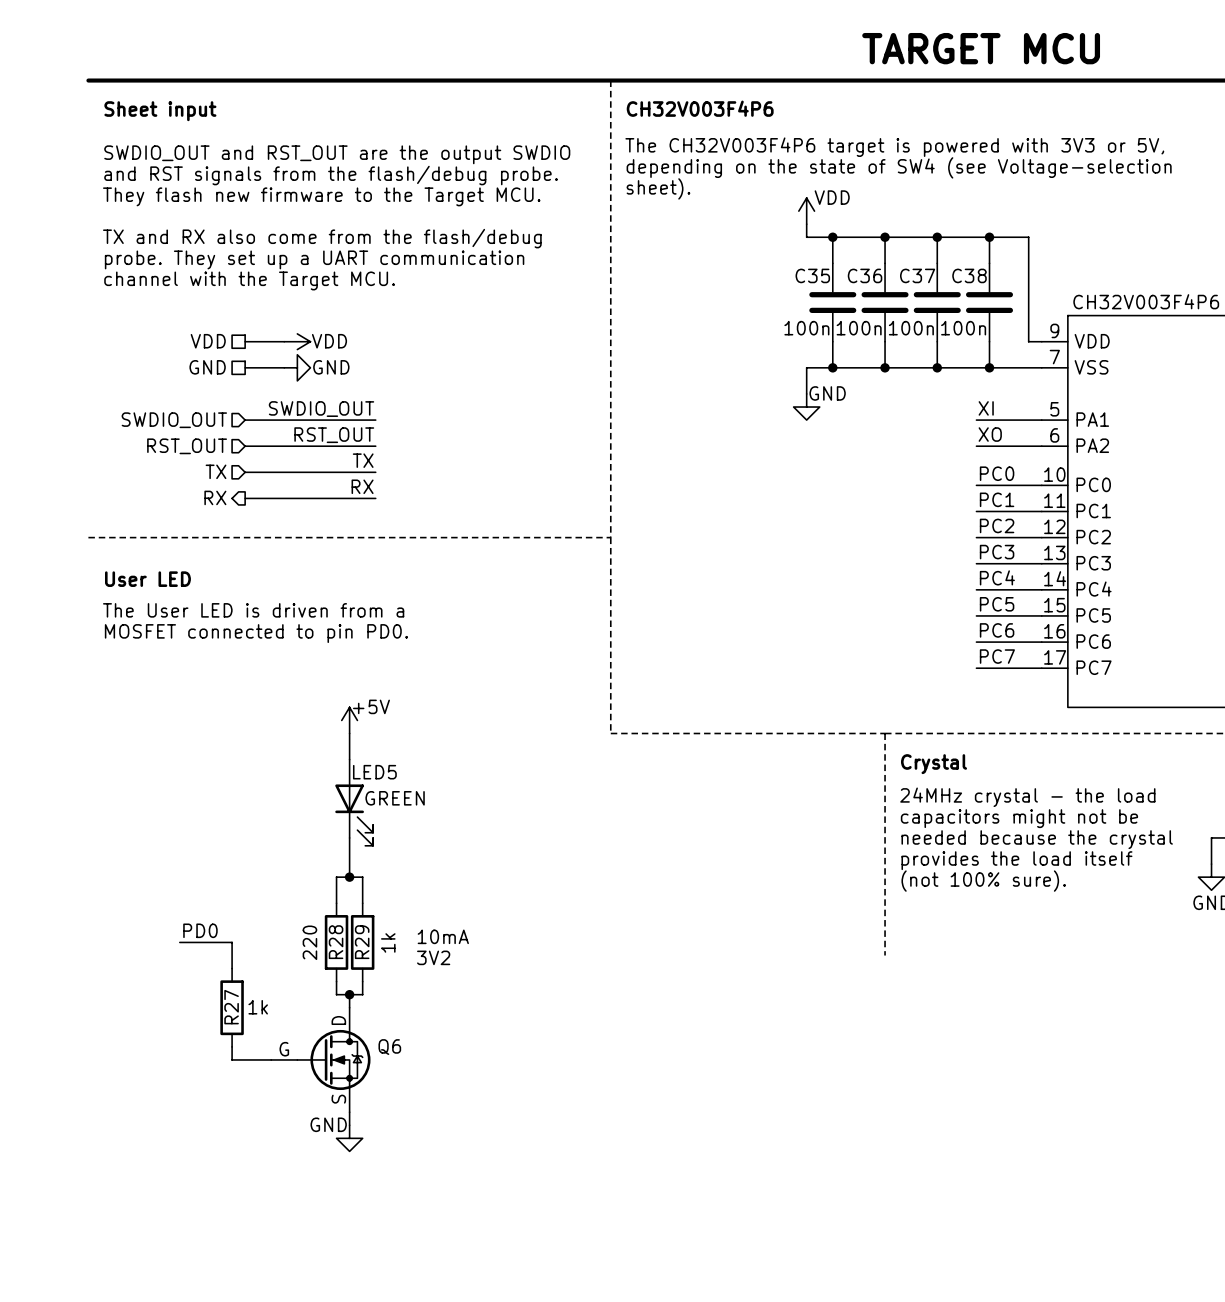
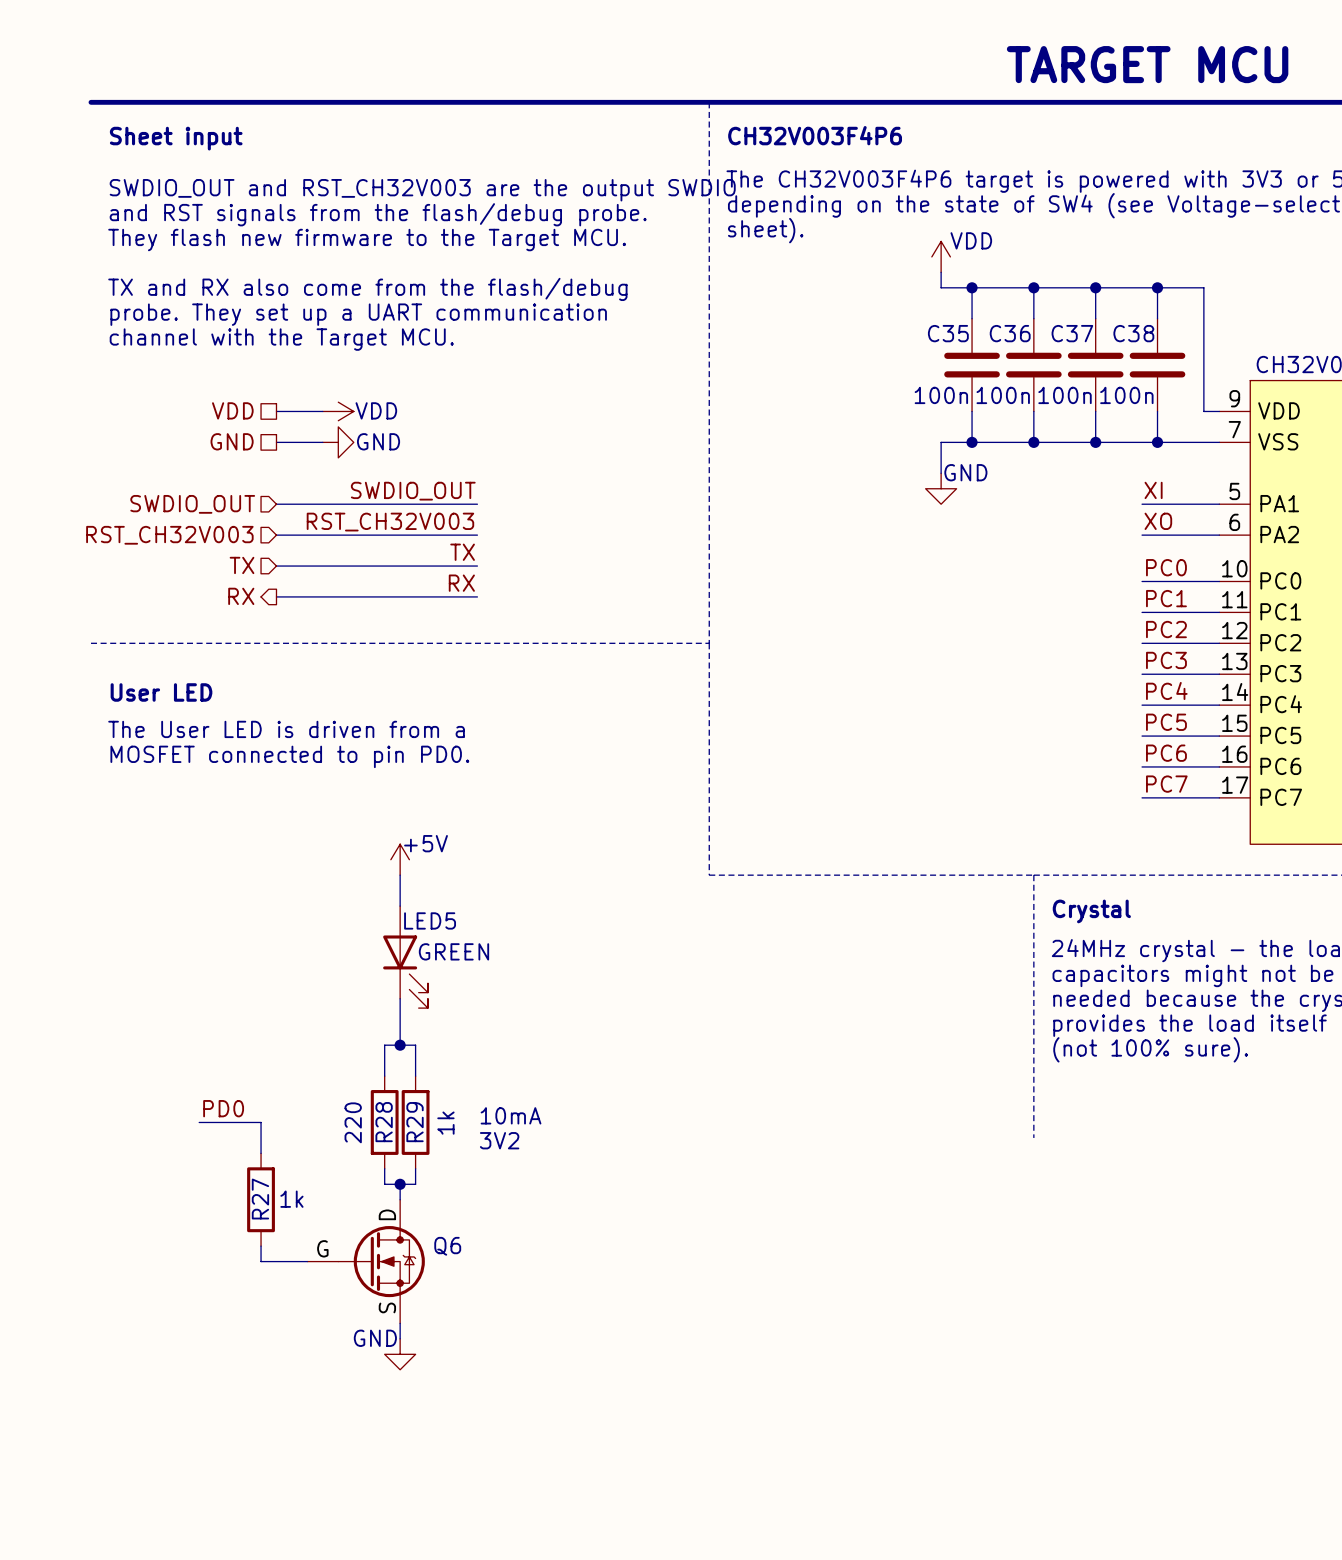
text: SWDIO_OUT and RST_OUT are the output SWDIO (337, 154) -> SWDIO_OUT and RST_CH32V003 are the output SWDIO (422, 190)
label position: SWDIO_OUT (321, 409) -> SWDIO_OUT (413, 491)
wire: none -> (431, 504) (477, 504)
label: RST_OUT (334, 435) -> none
label: none -> RST_CH32V003 (390, 522)
hierarchical label: RST_OUT (187, 446) -> RST_CH32V003 (169, 535)
wire: none -> (431, 535) (477, 535)
label position: TX (363, 460) -> TX (462, 552)
wire: none -> (431, 566) (477, 566)
label position: RX (362, 486) -> RX (461, 583)
wire: none -> (431, 596) (477, 596)

